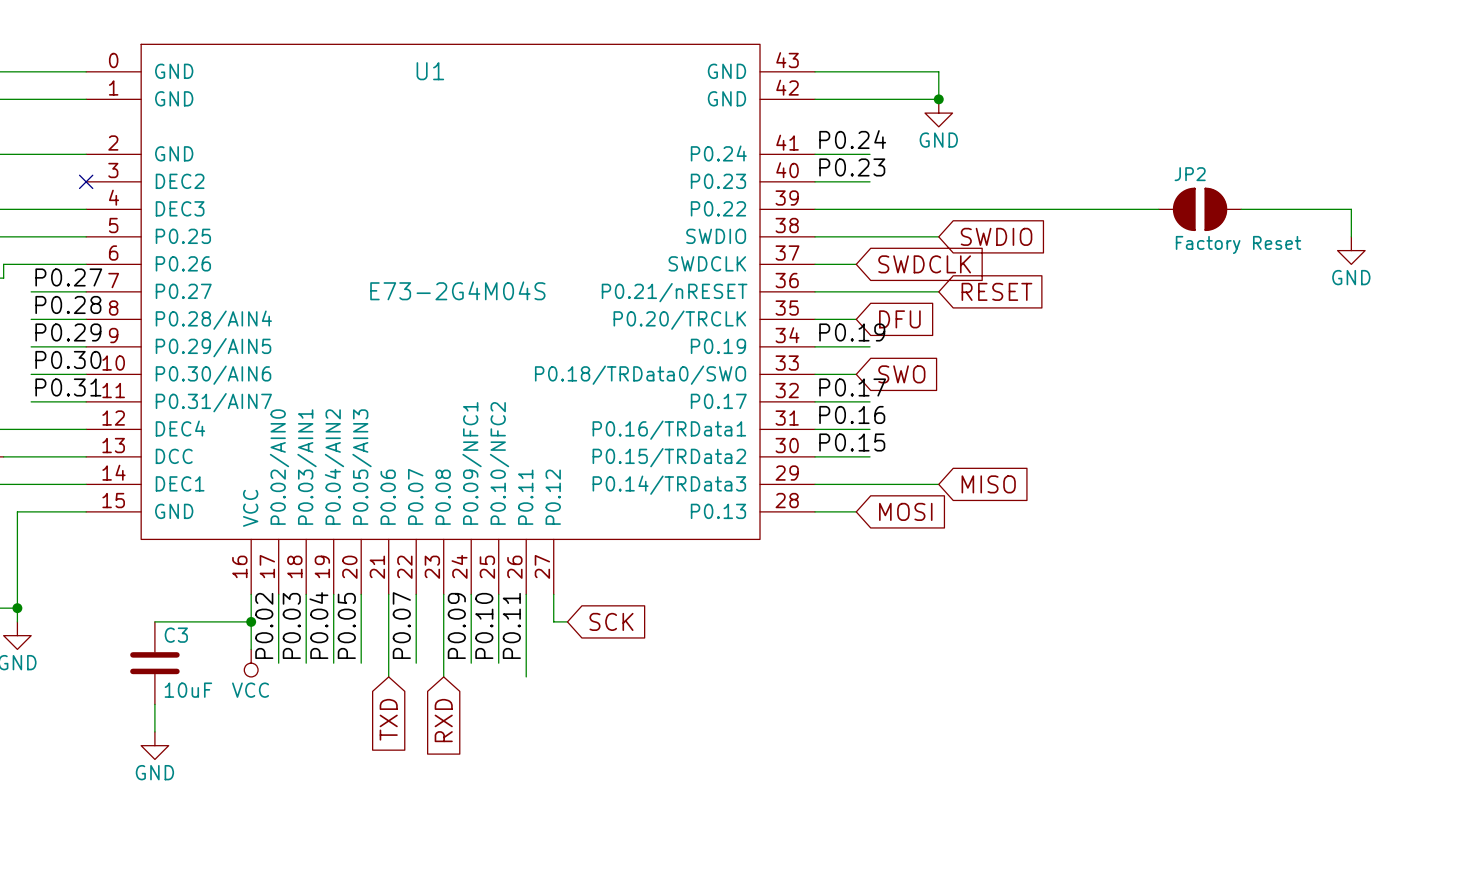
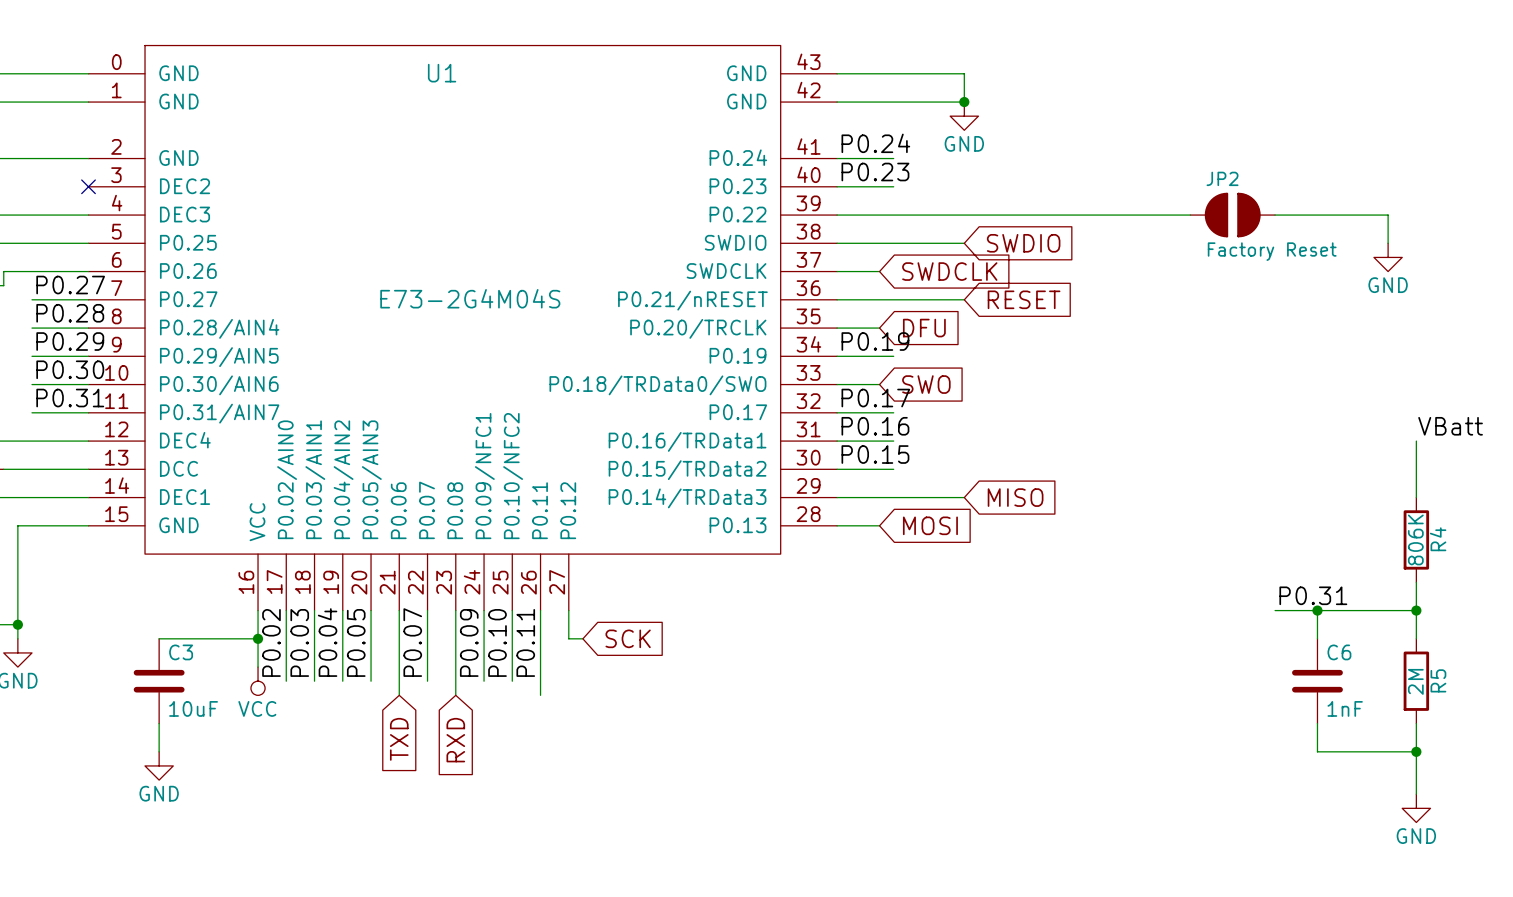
label: none -> VBatt (1450, 426)
wire: none -> (1416, 441) (1416, 497)
R4: none -> 806K (1416, 539)
wire: none -> (1416, 582) (1416, 638)
label: none -> P0.31 (1313, 595)
wire: none -> (1275, 610) (1416, 610)
wire: none -> (1317, 610) (1317, 638)
junction: none -> (1317, 610)
junction: none -> (1416, 610)
C6: none -> 1nF (1317, 681)
R5: none -> 2M (1416, 681)
wire: none -> (1317, 723) (1317, 751) (1416, 751)
wire: none -> (1416, 723) (1416, 794)
junction: none -> (1416, 751)
power symbol: none -> GND (1416, 808)

